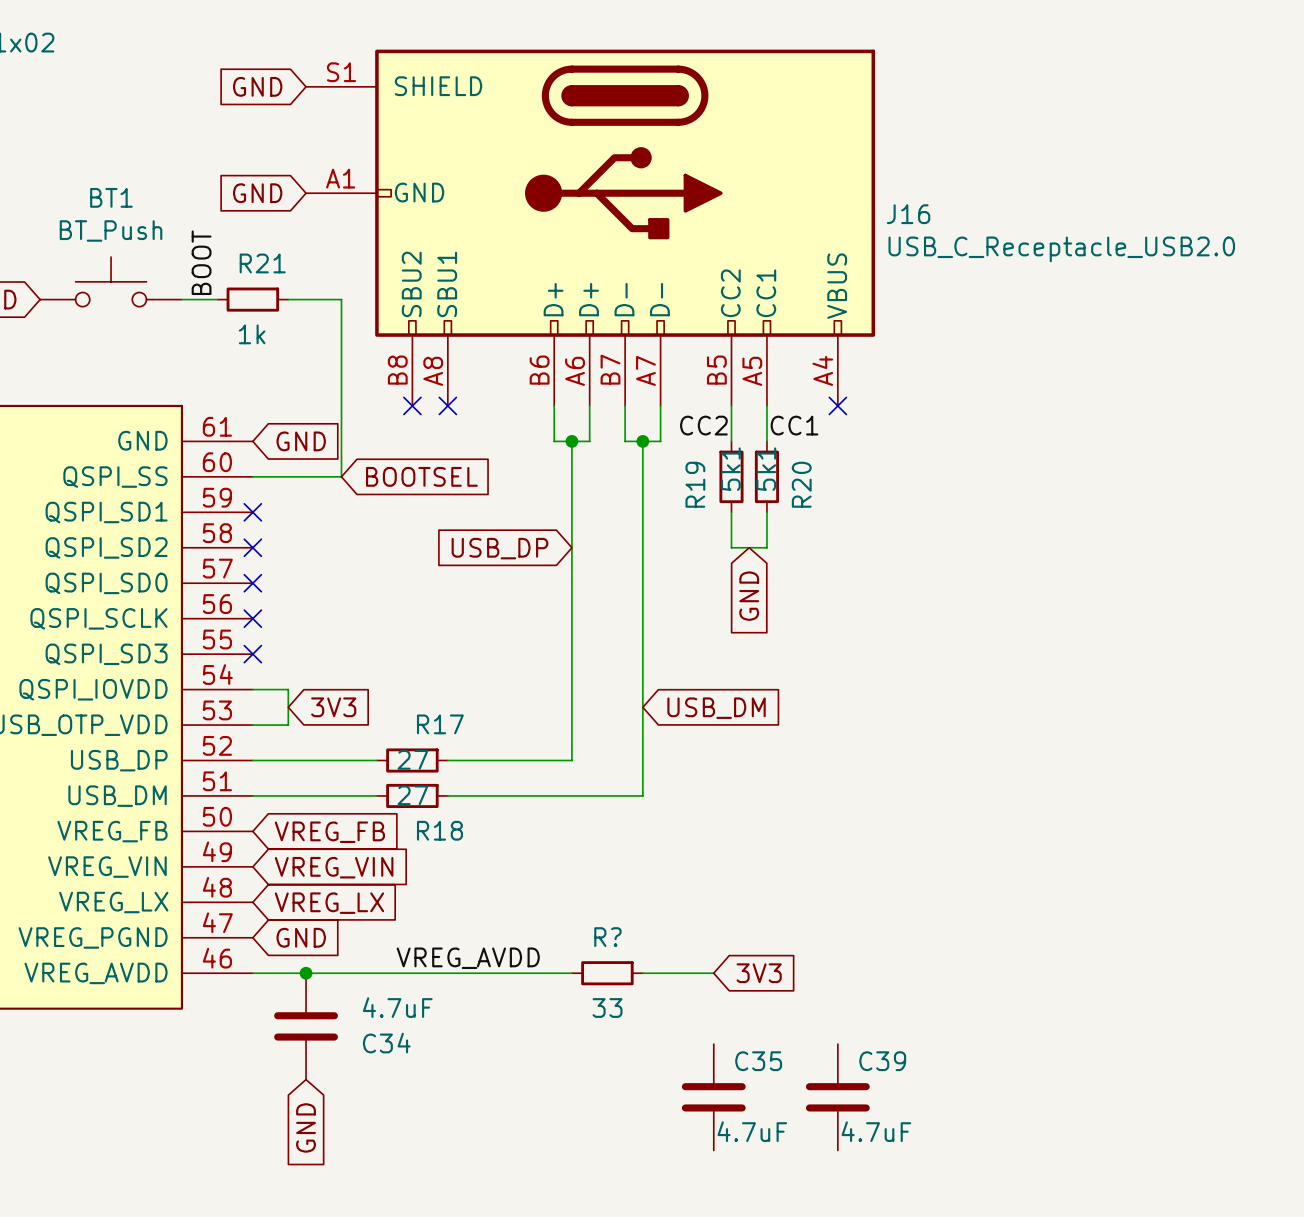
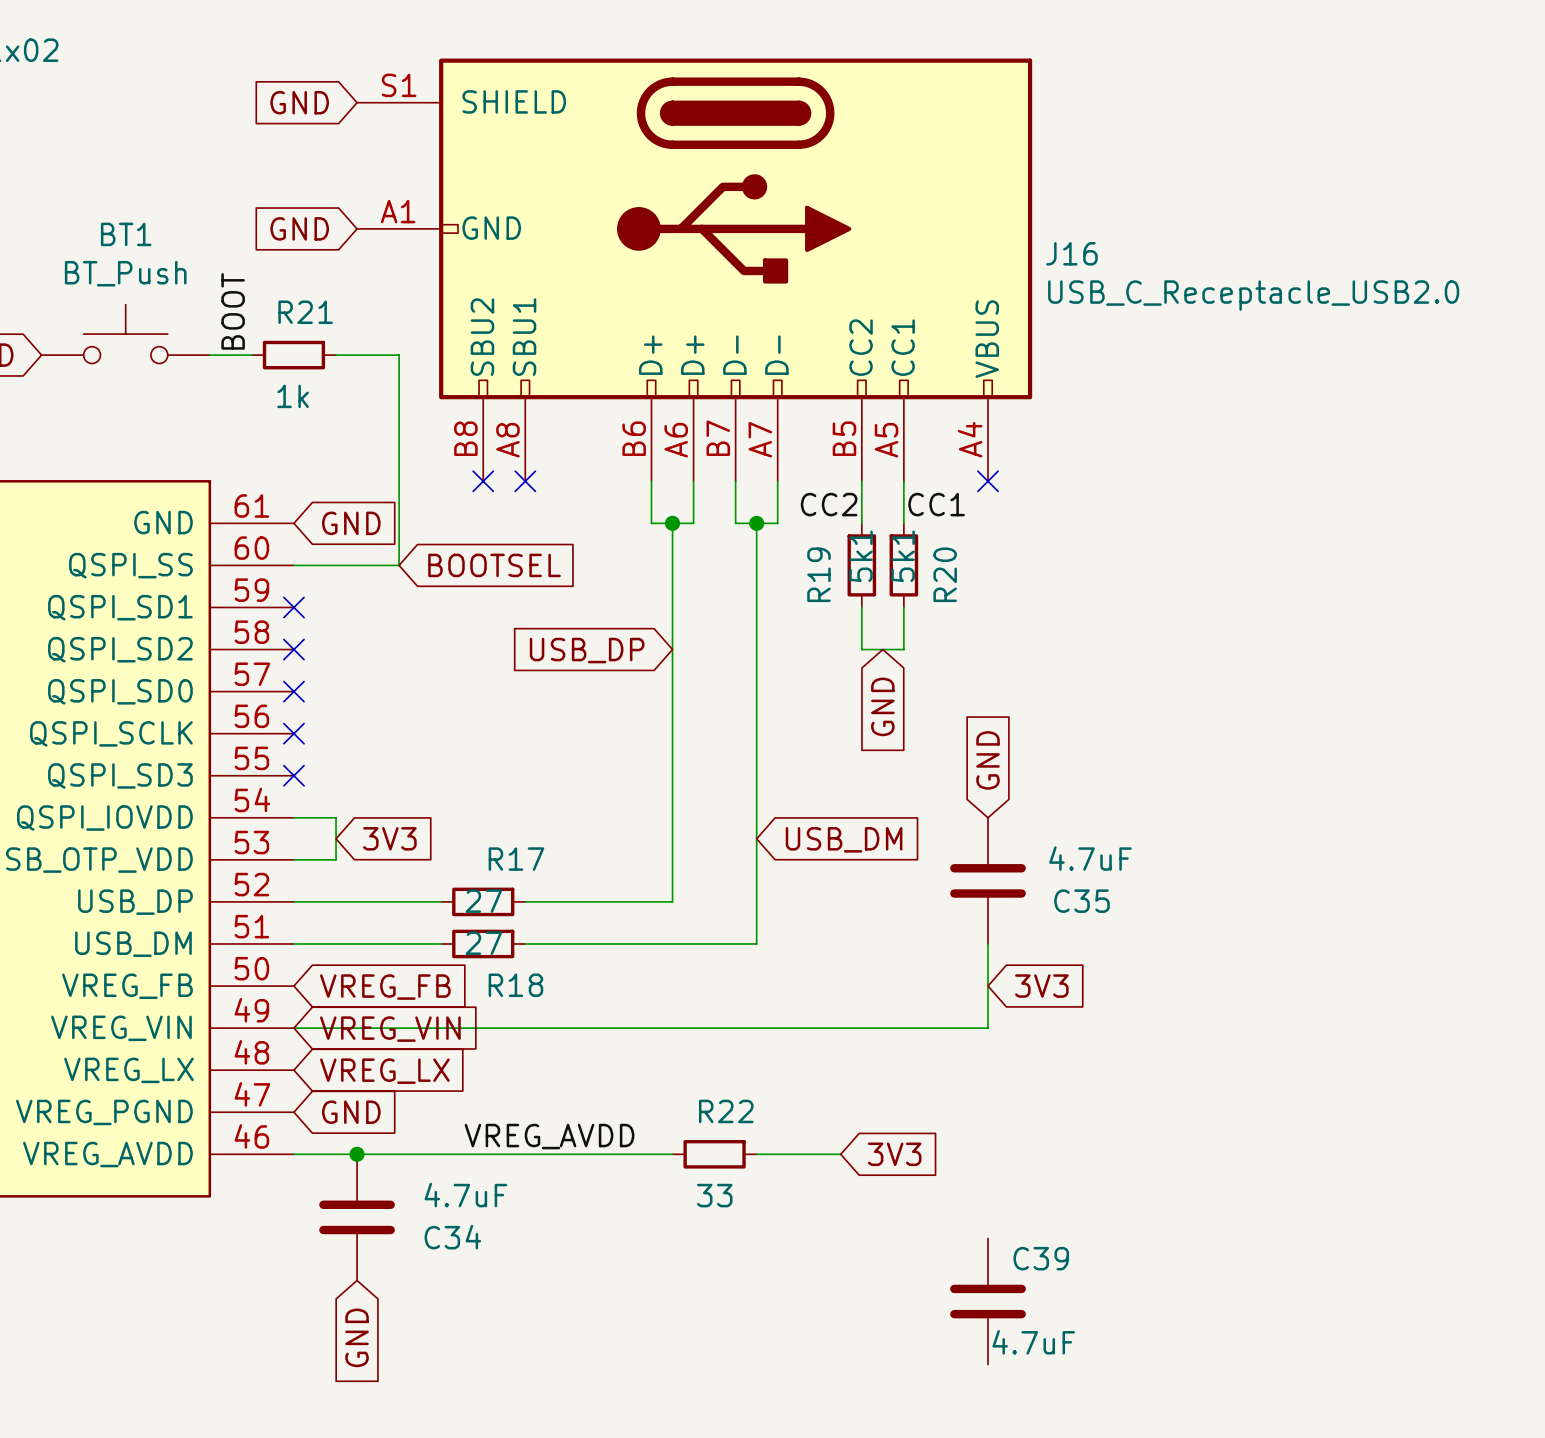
global label: none -> GND (988, 760)
wire: none -> (988, 943) (988, 1028) (293, 1028)
global label: none -> 3V3 (1041, 986)
R? name: R? (607, 937) -> R22 (726, 1111)
C35 name position: C35 (758, 1061) -> C35 (1081, 901)
C35 position: (713, 1097) -> (988, 880)
C35 value position: 4.7uF (752, 1131) -> 4.7uF (1090, 858)

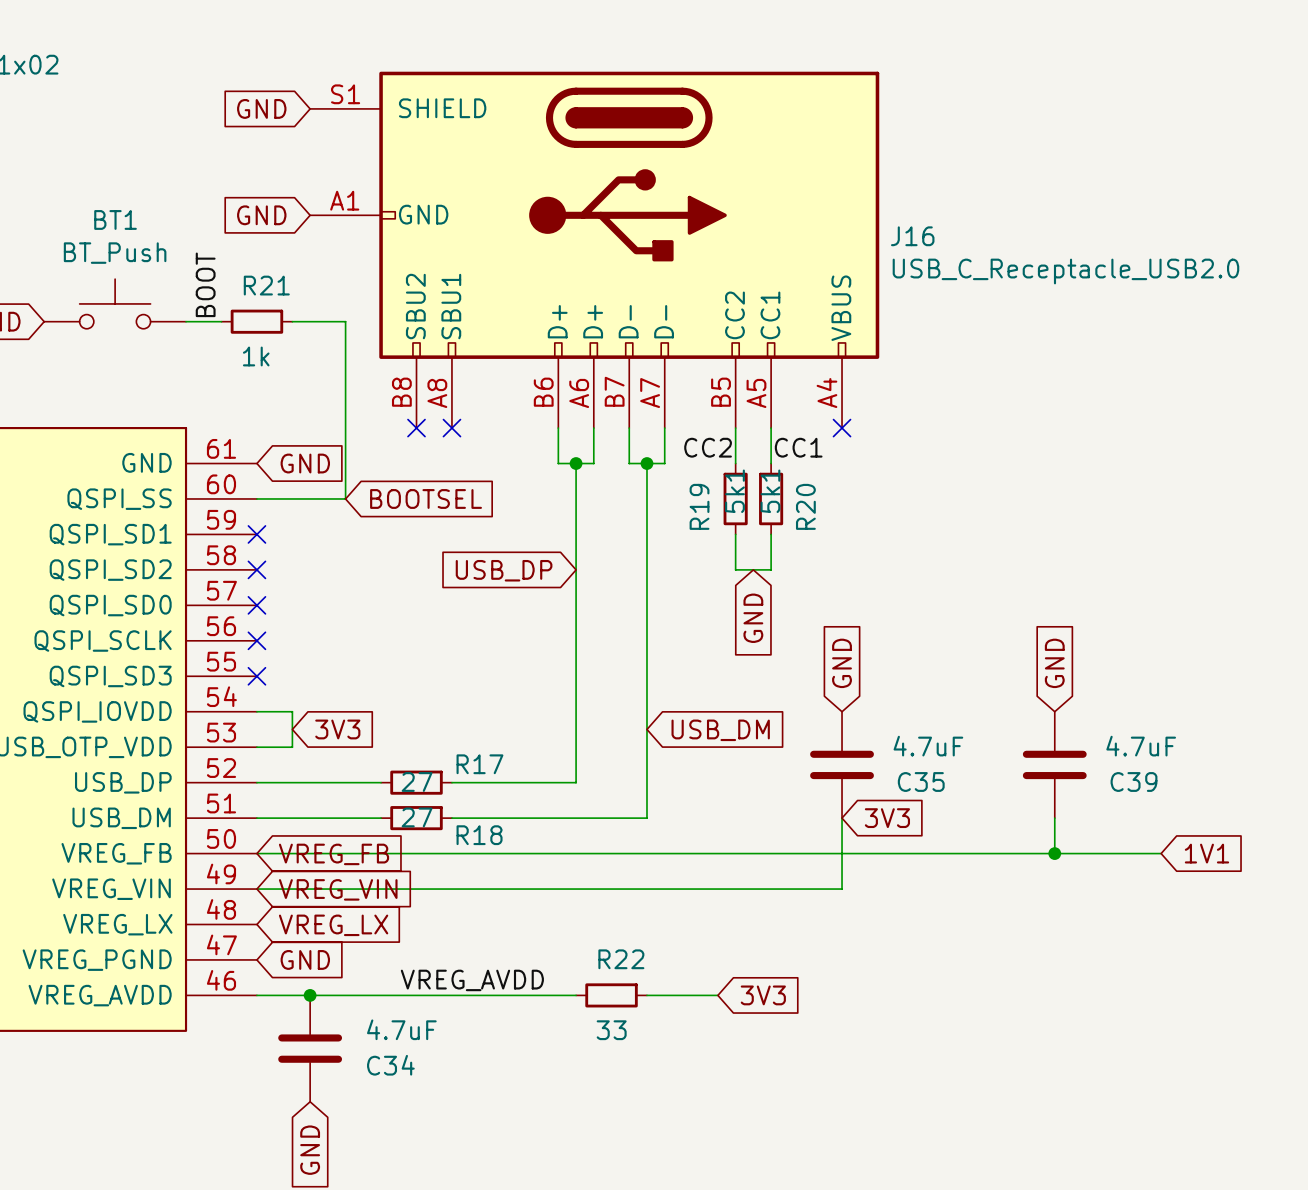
global label: none -> GND (1054, 663)
R17 name position: R17 (516, 859) -> R17 (479, 764)
wire: none -> (1054, 818) (1054, 853)
R18 name position: R18 (515, 985) -> R18 (479, 835)
wire: none -> (256, 853) (1161, 853)
global label position: 3V3 (1041, 986) -> 3V3 (887, 818)
junction: none -> (1054, 853)
global label: none -> 1V1 (1206, 853)
C39 name position: C39 (1041, 1258) -> C39 (1134, 781)
C39 position: (988, 1301) -> (1054, 764)
C39 value position: 4.7uF (1033, 1342) -> 4.7uF (1141, 746)

